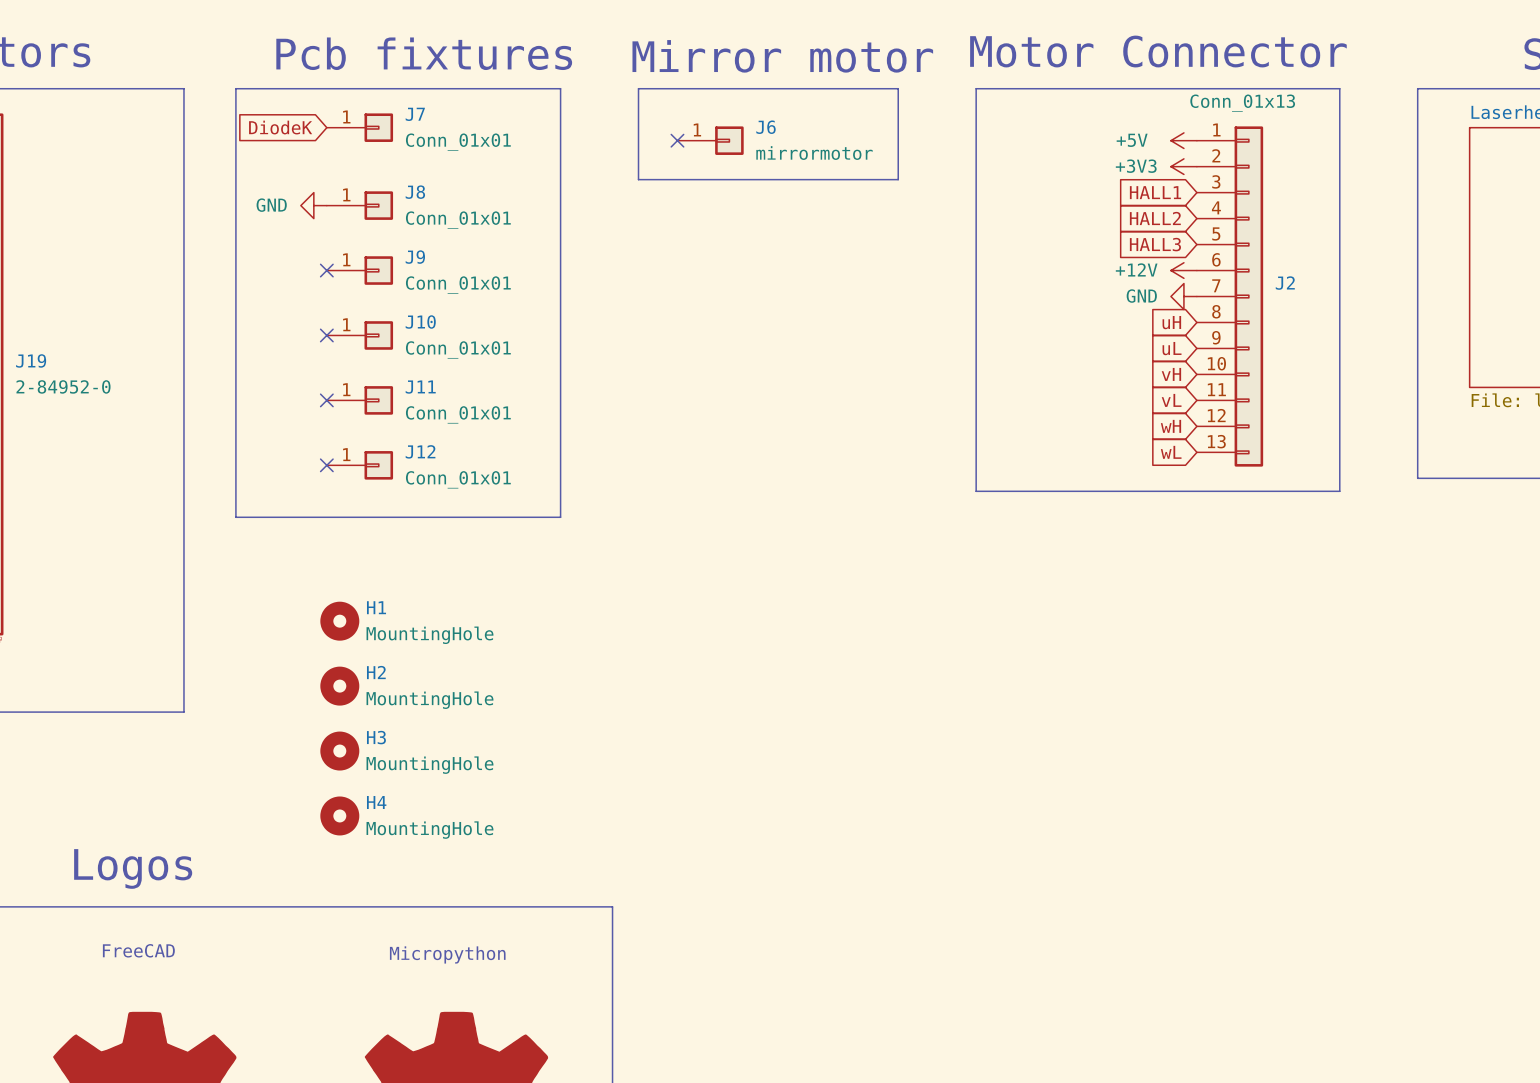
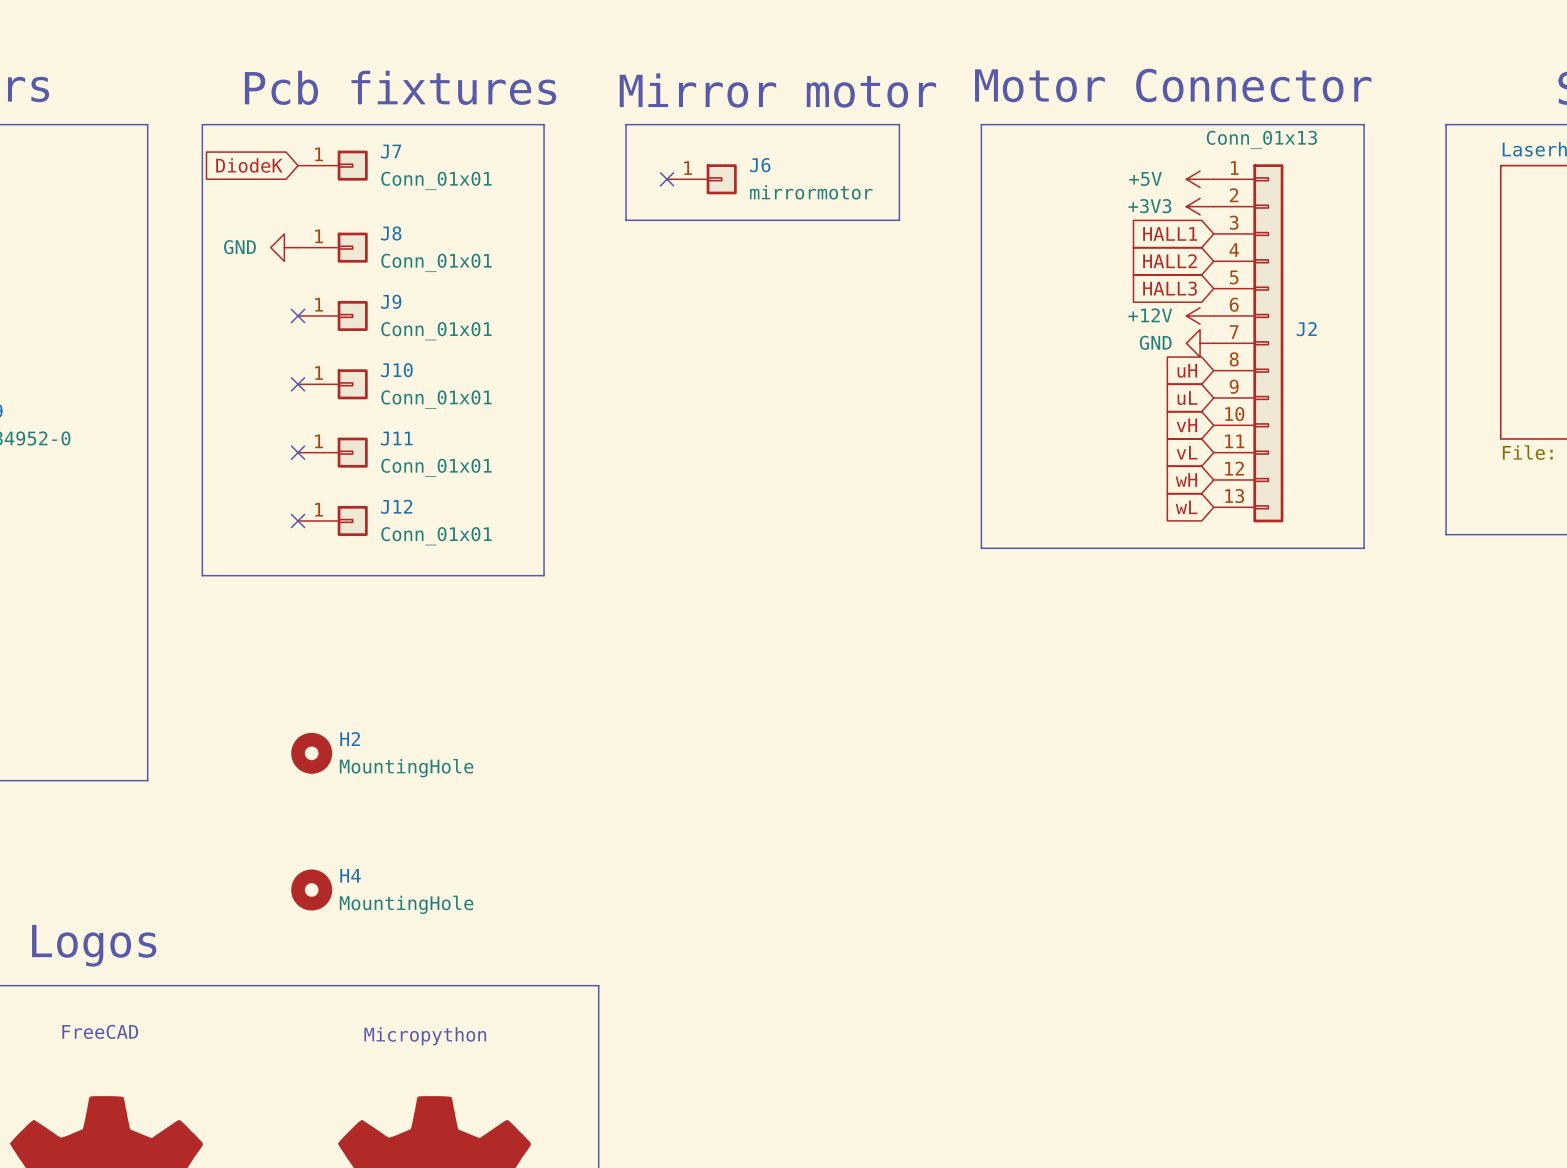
H1: MountingHole (339, 621) -> none
H3: MountingHole (339, 751) -> none

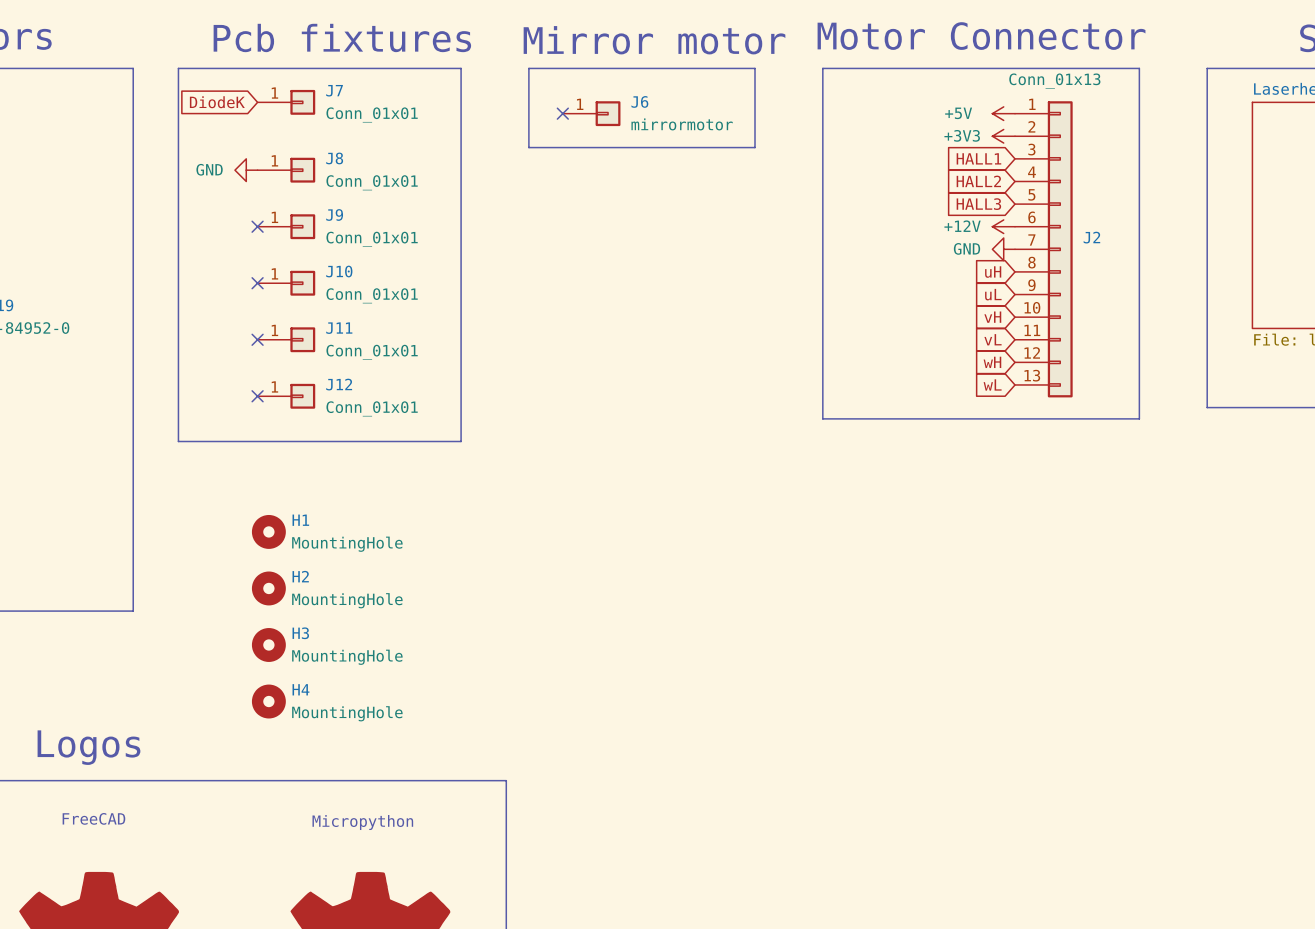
H1: none -> MountingHole (268, 531)
H3: none -> MountingHole (268, 644)

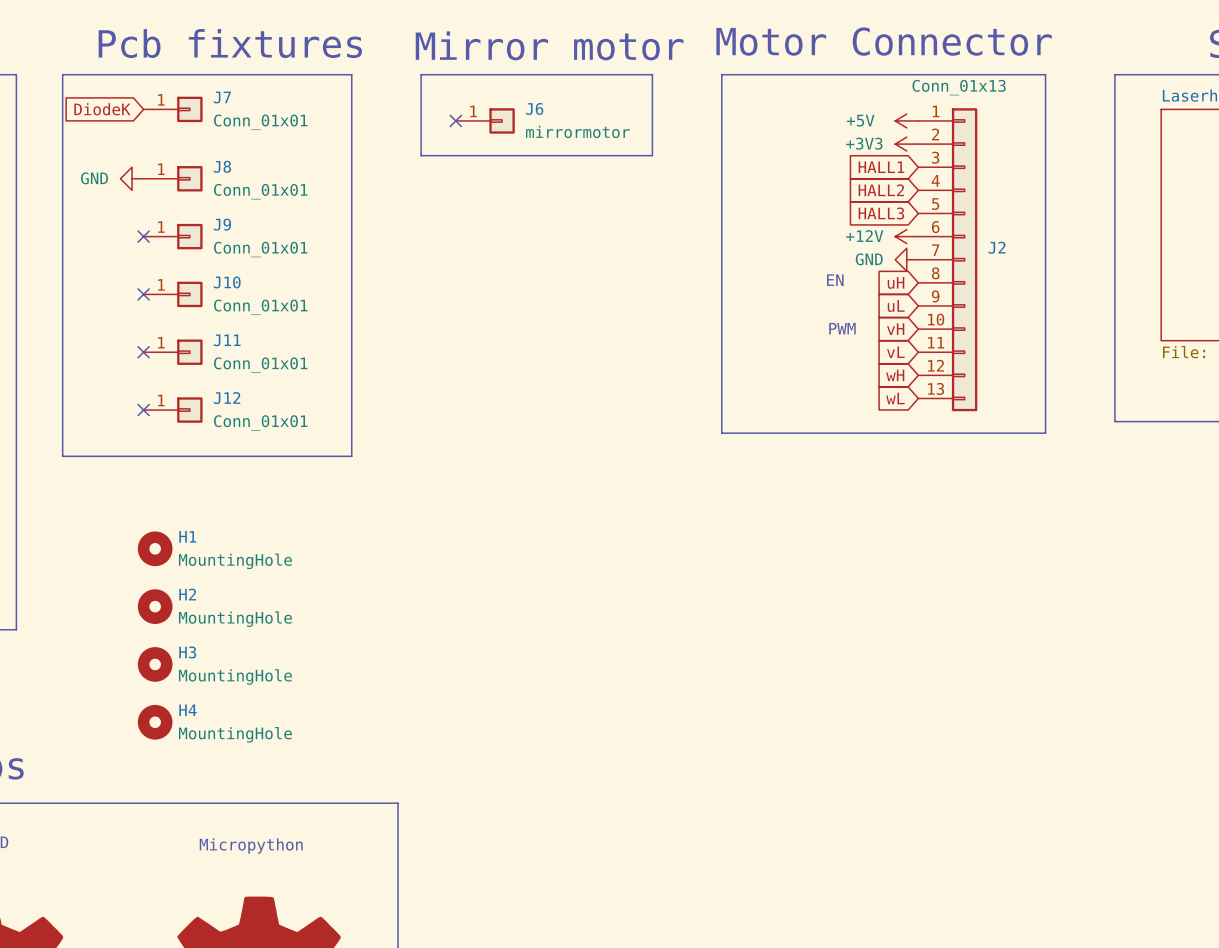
text: none -> EN (835, 280)
text: none -> PWM (842, 328)

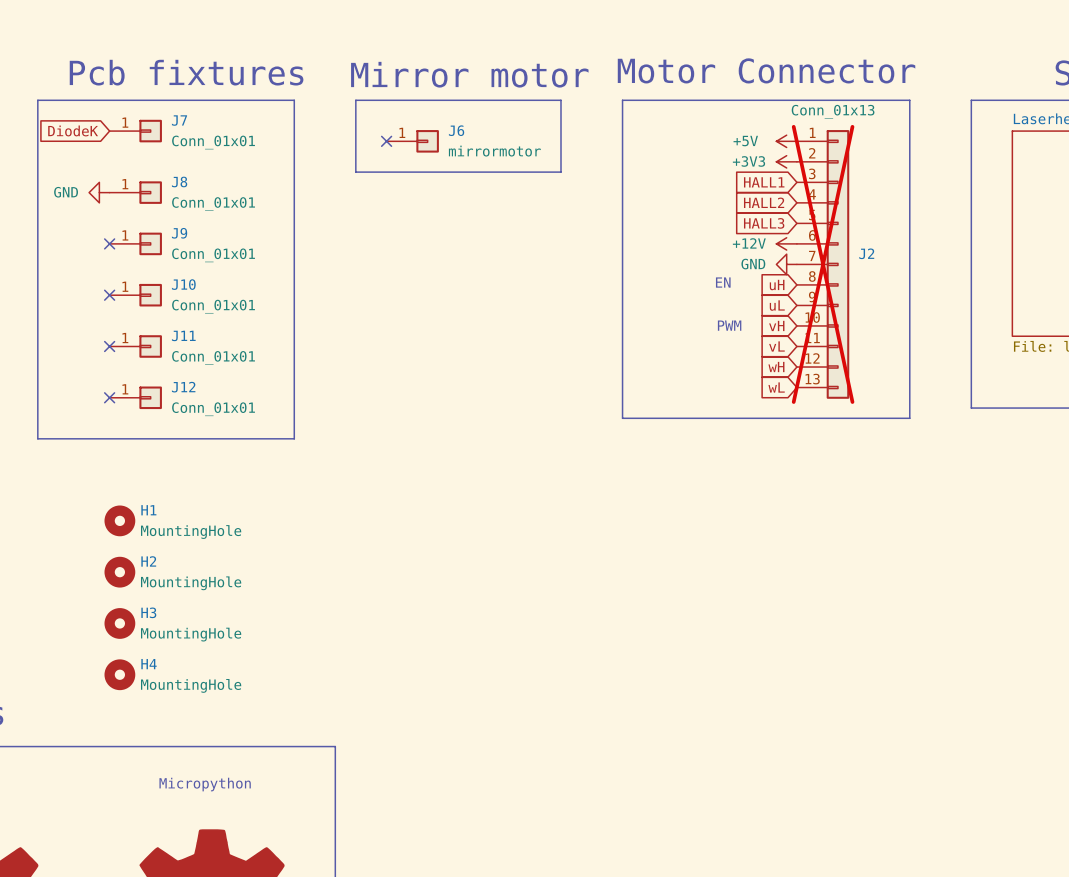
J2 do-not-place cross: none -> (823, 264)

